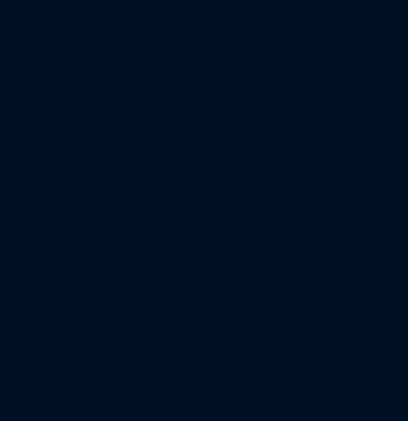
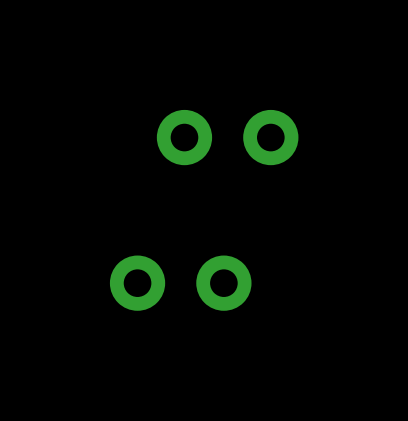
part: none -> (227, 137)
part: none -> (180, 283)

